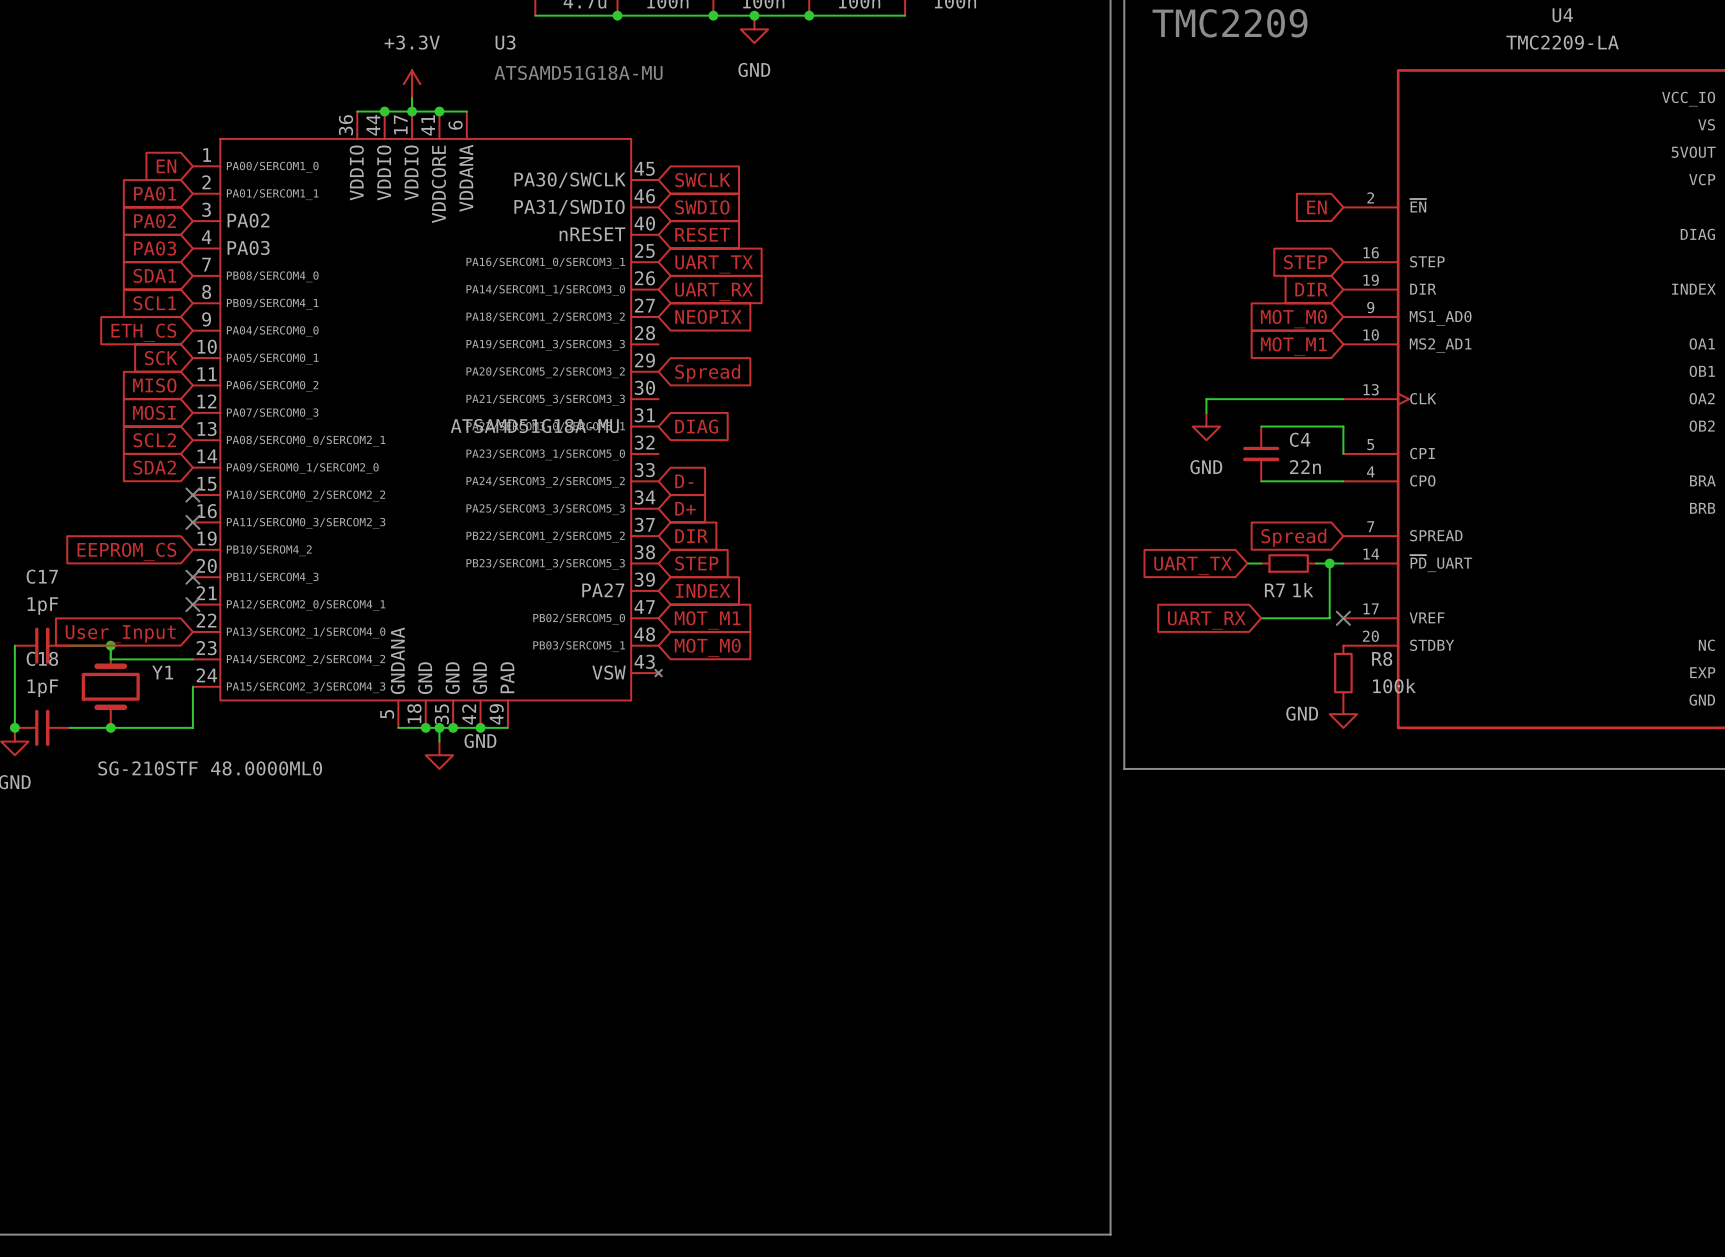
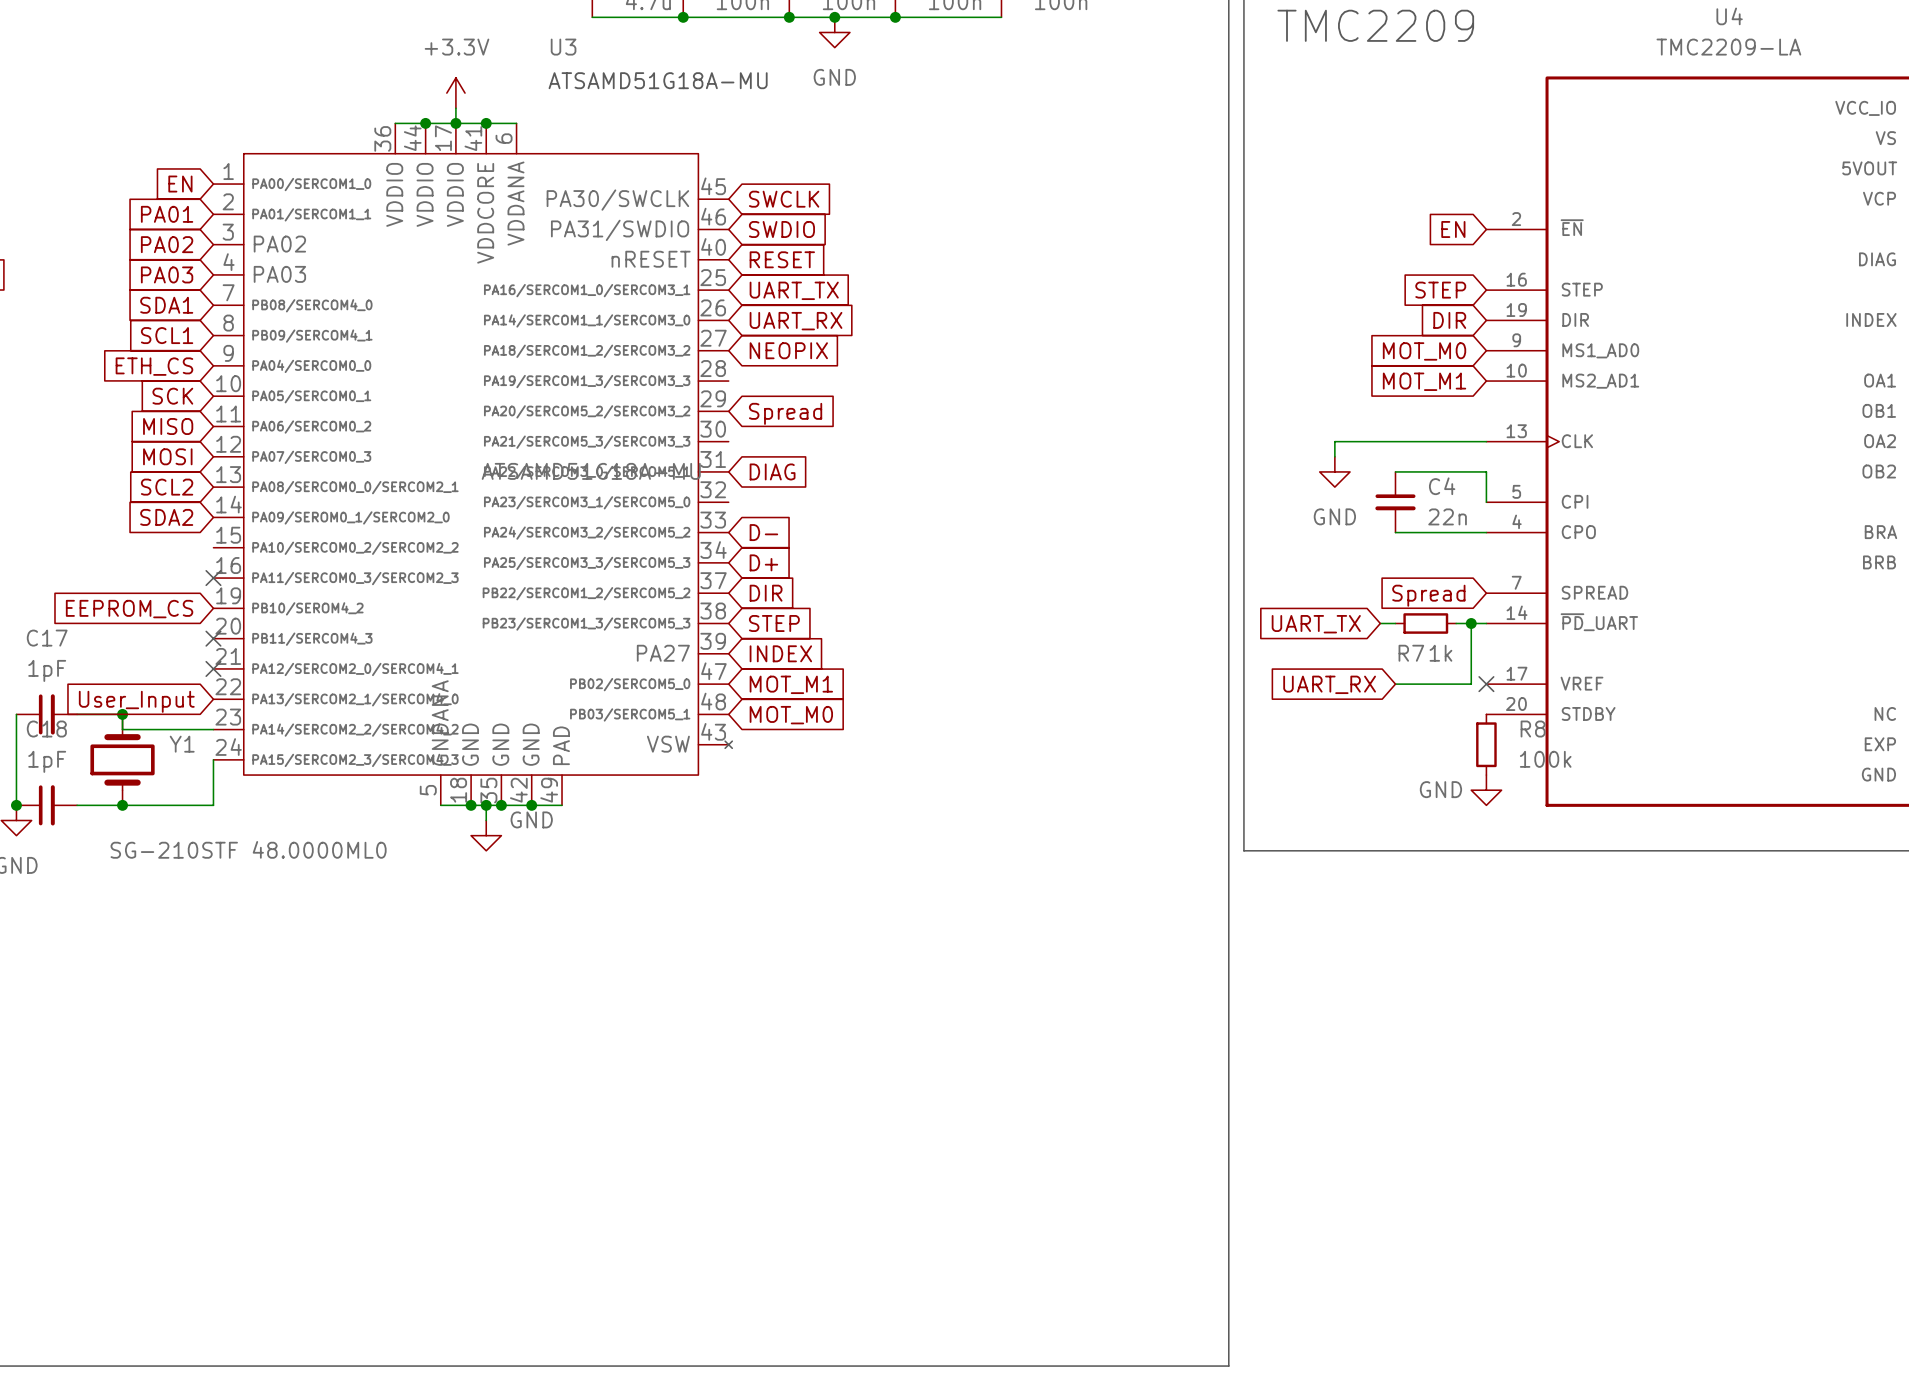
no-connect mark: (192, 495) -> none

